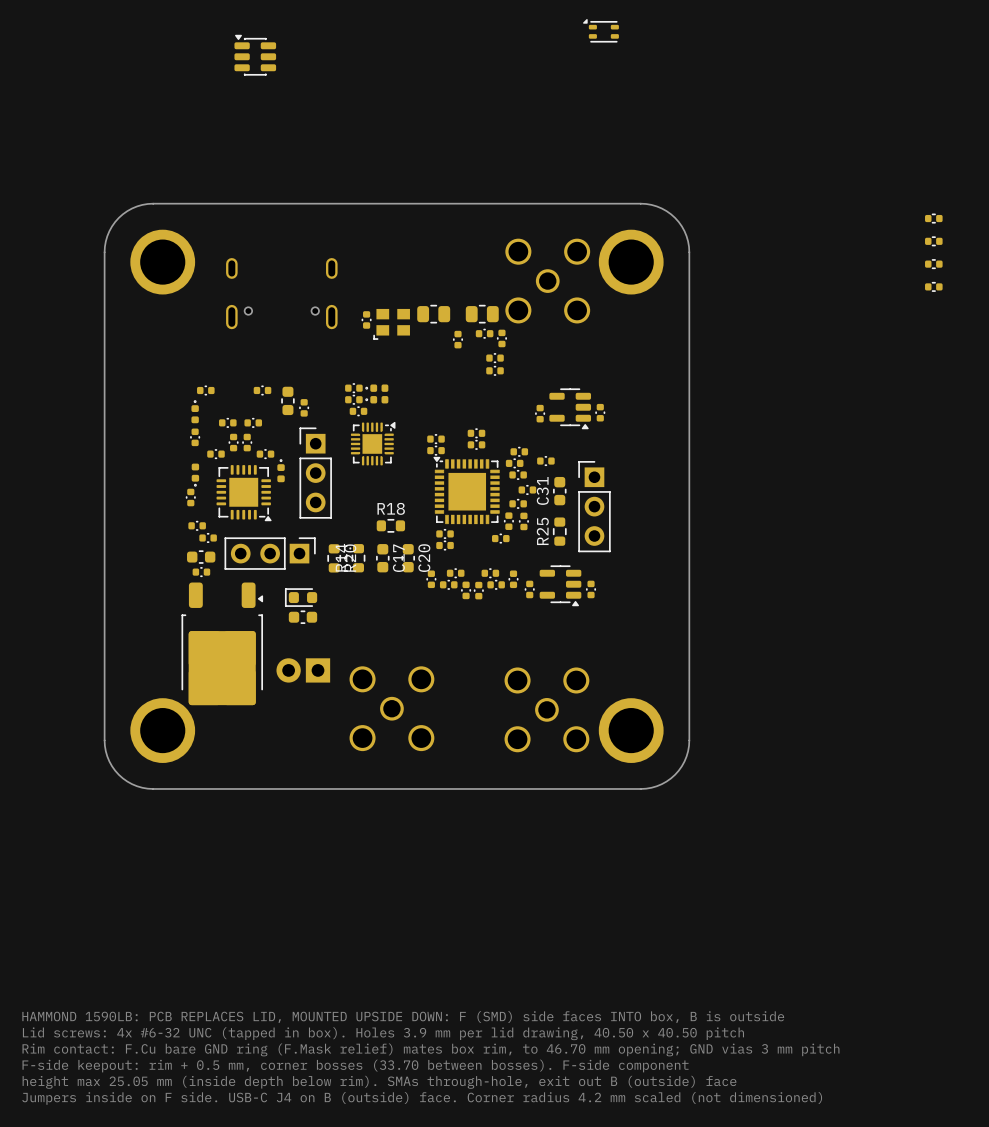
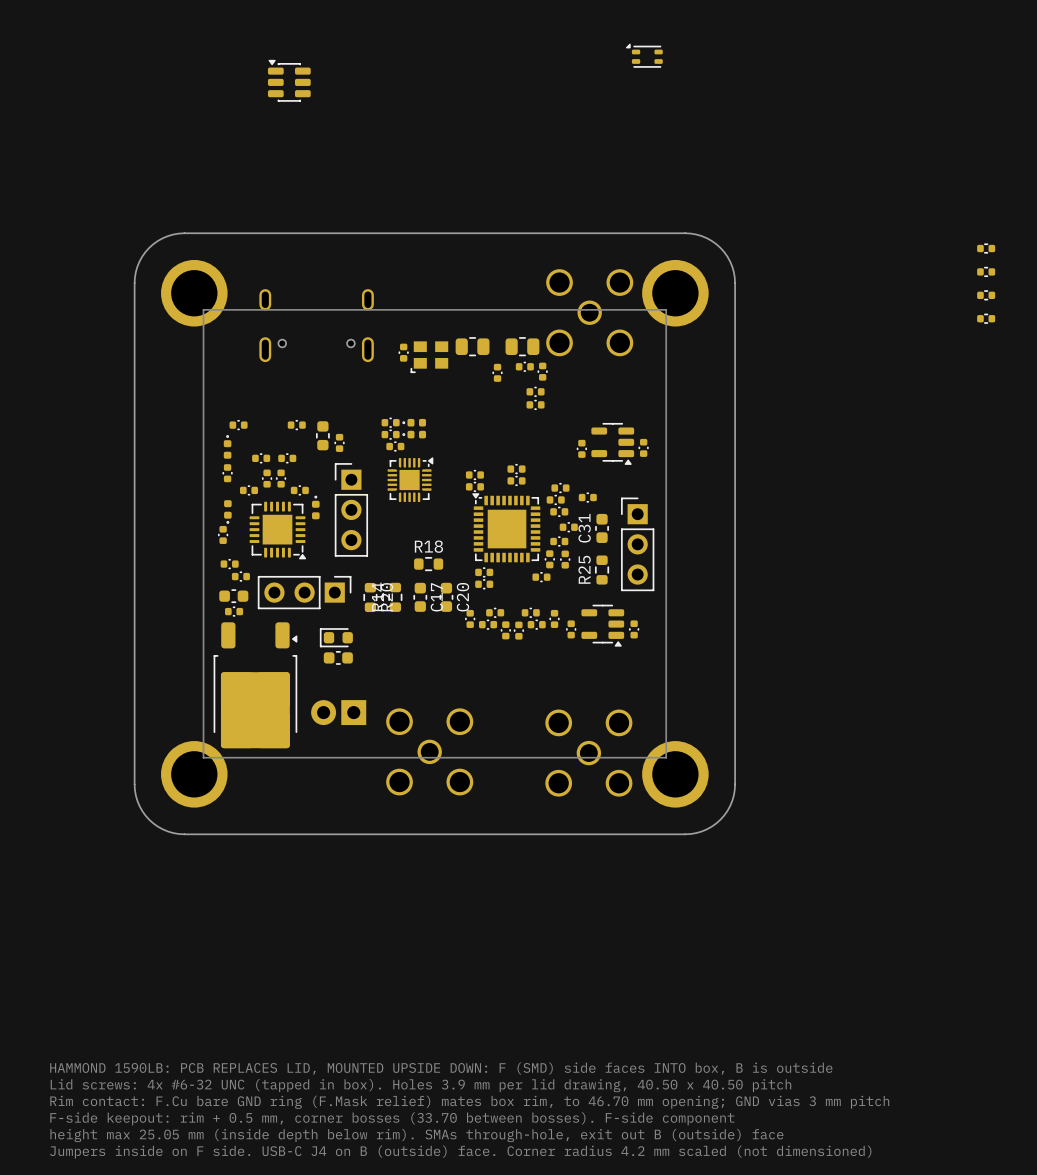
line: none -> (203, 309) (666, 309) (666, 757) (203, 757) (203, 309)

